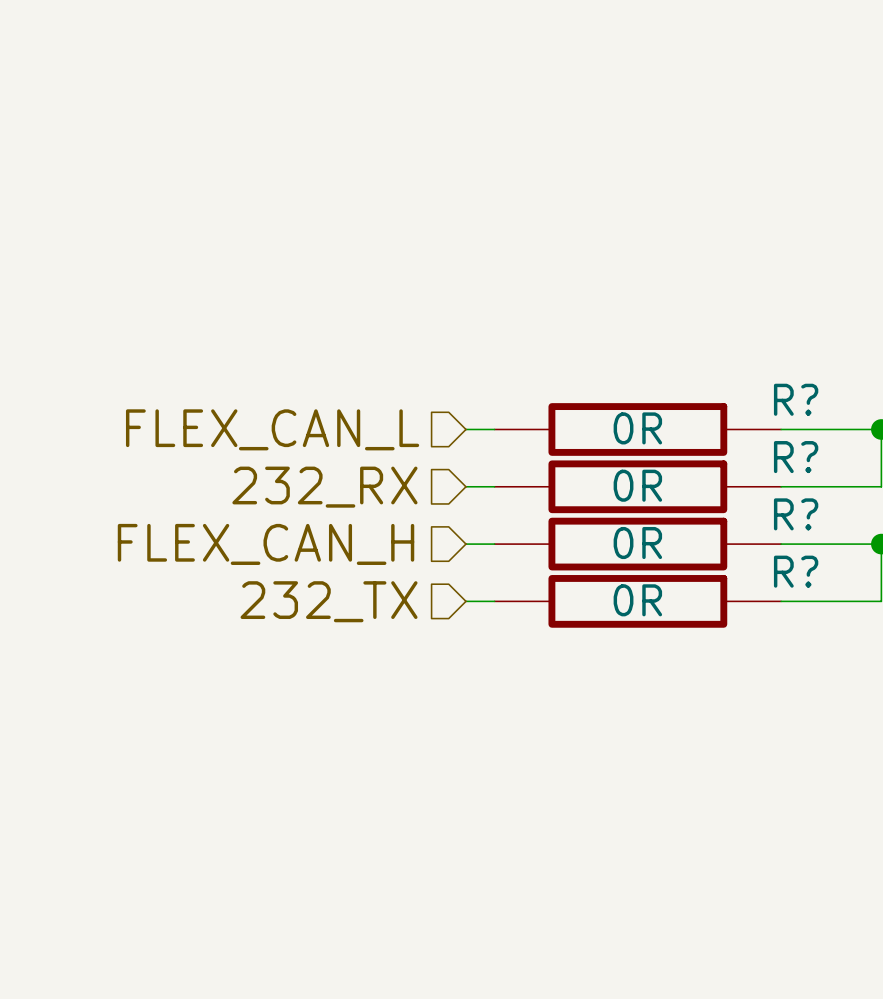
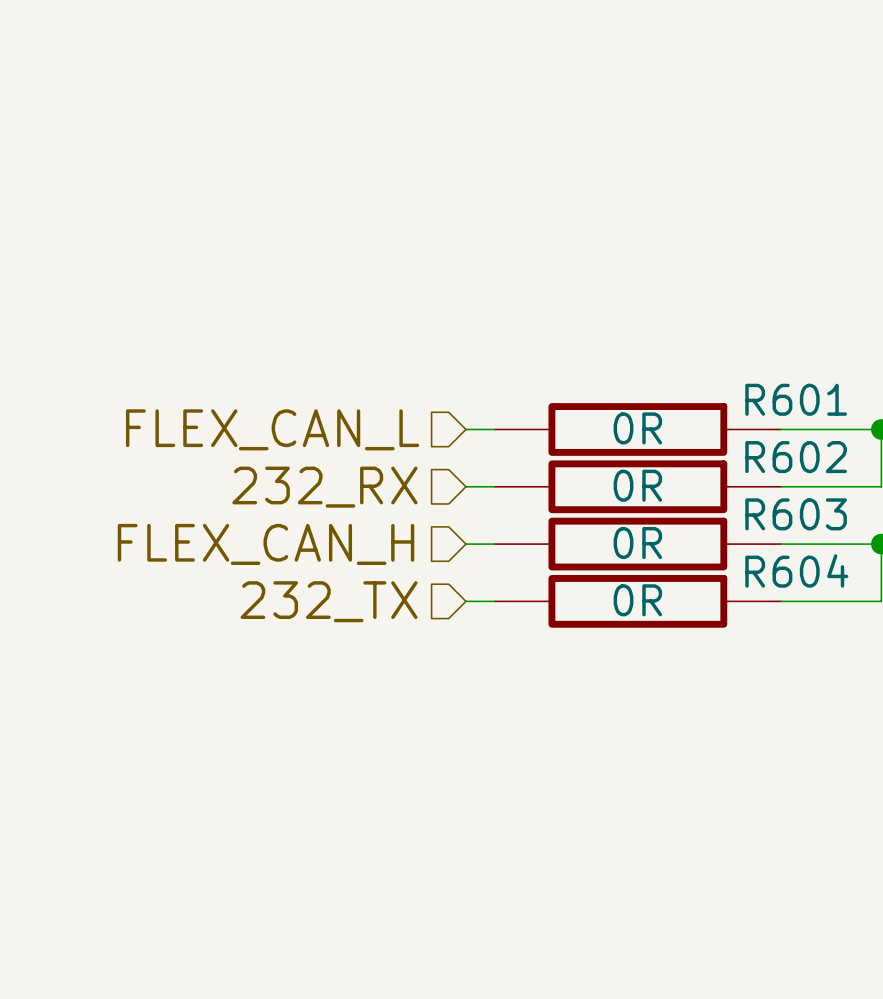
R? name: R? (796, 399) -> R601 (796, 399)
R? name: R? (796, 457) -> R602 (796, 457)
R? name: R? (796, 514) -> R603 (796, 514)
R? name: R? (796, 571) -> R604 (796, 570)

